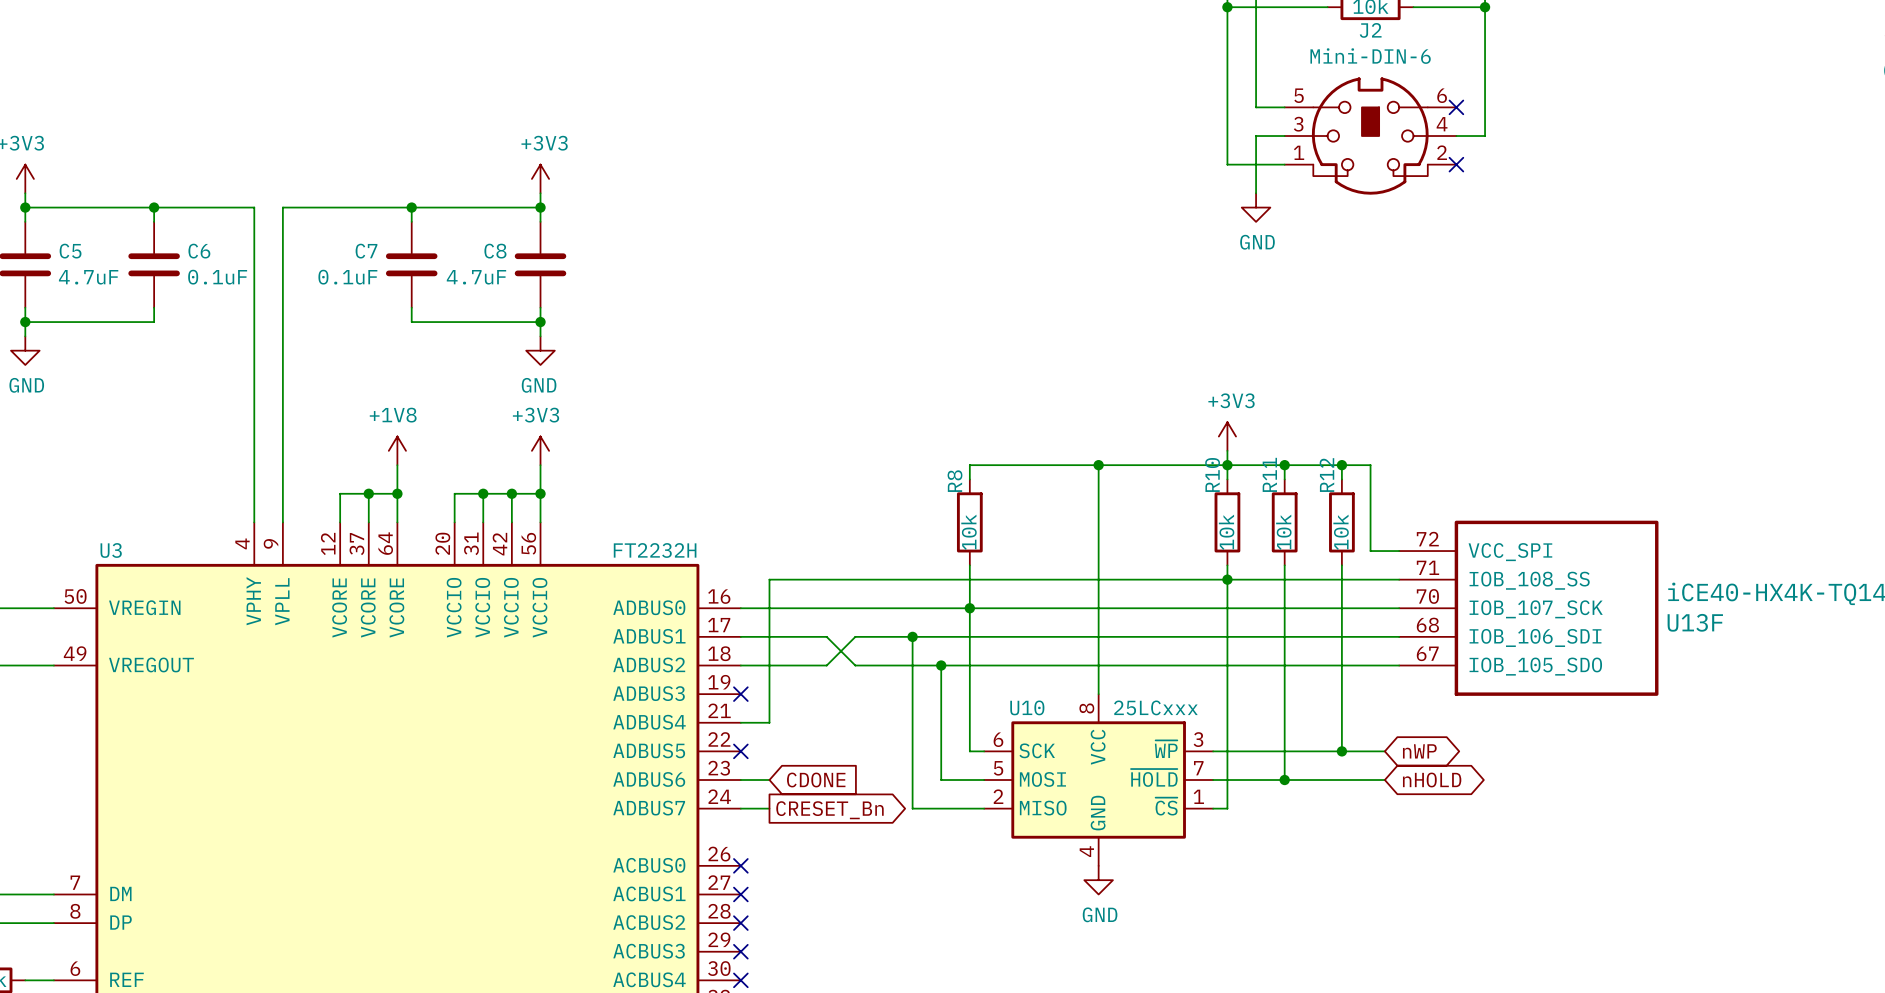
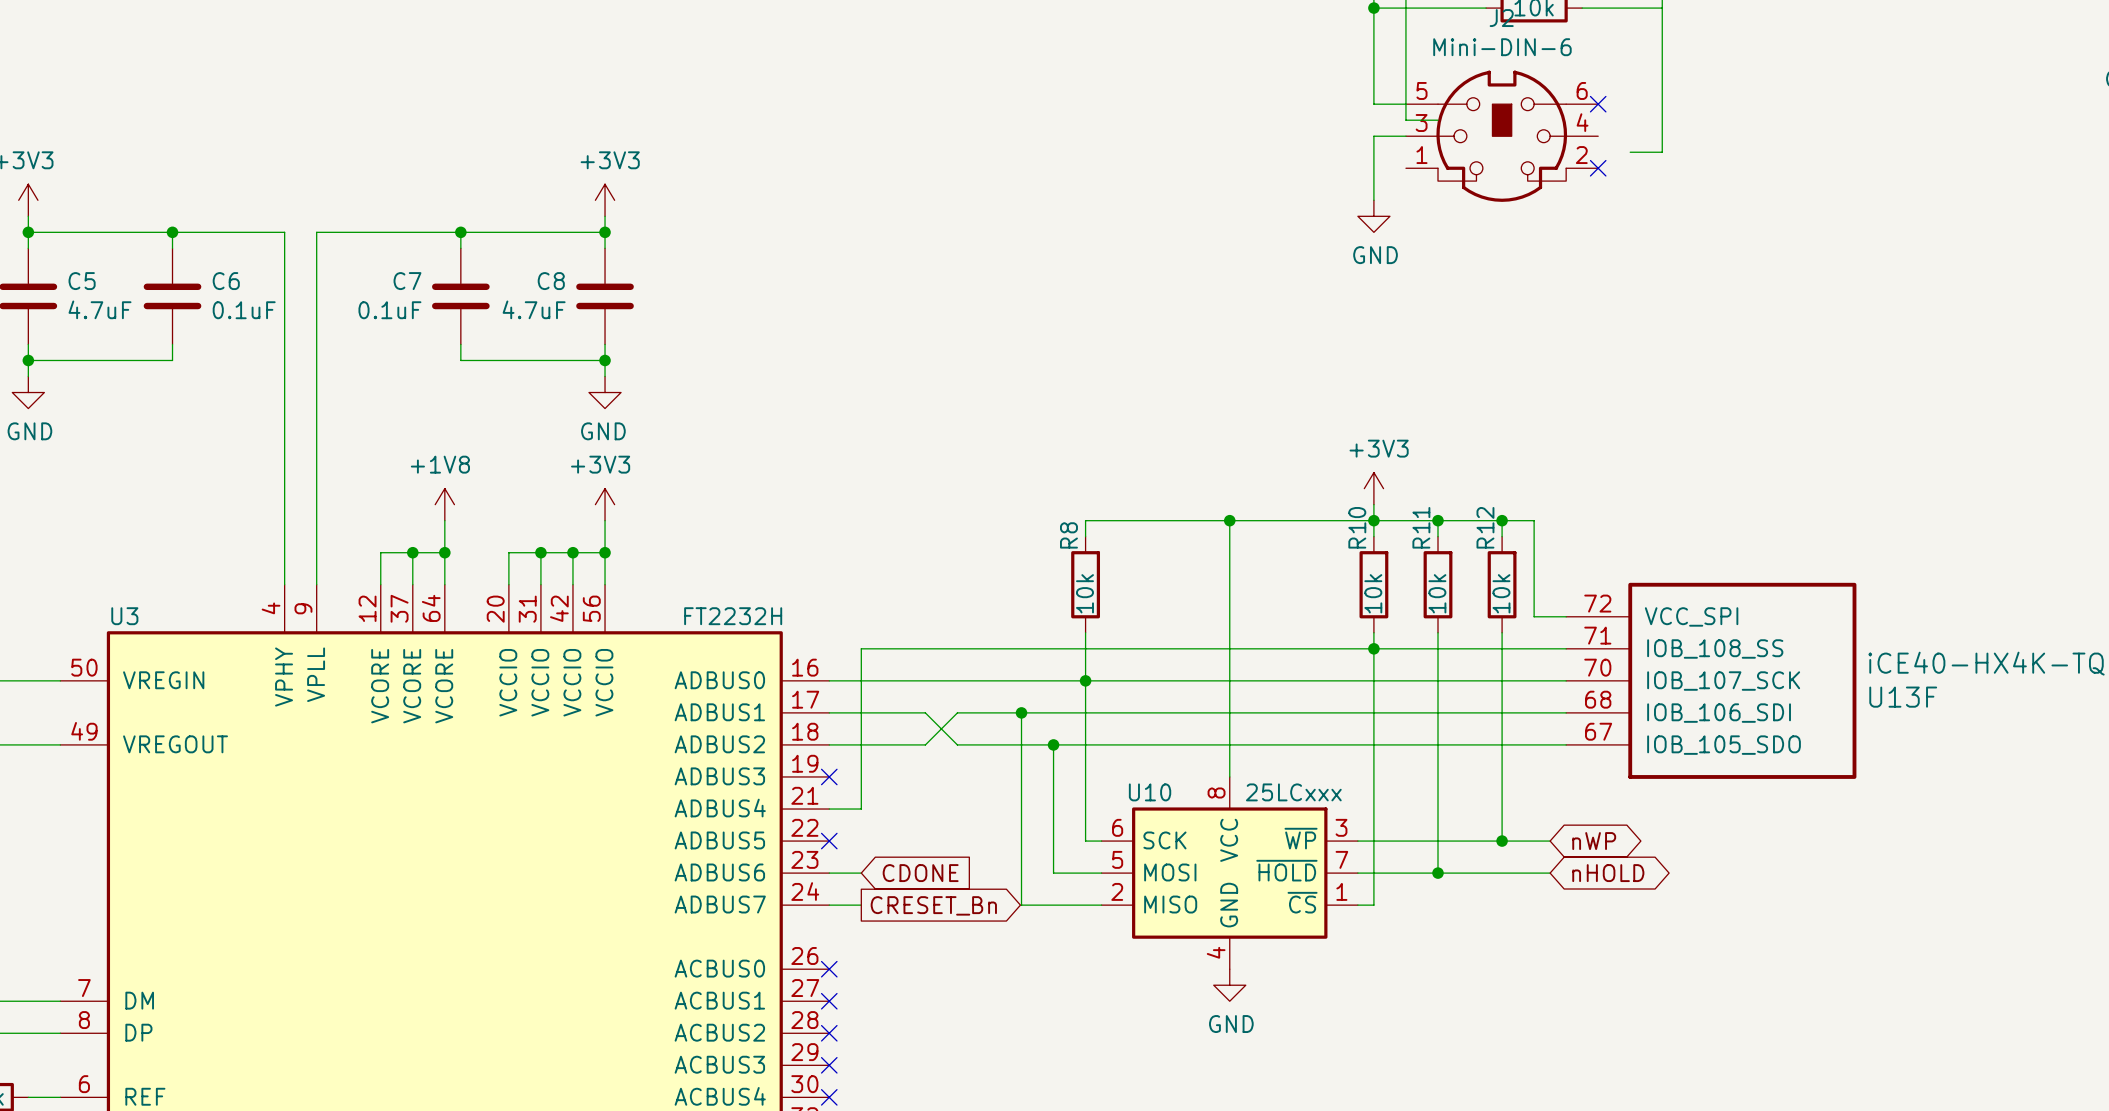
junction: (1485, 7) -> none
wire: (1227, 93) (1227, 121) -> (1373, 104) (1405, 104)
no-connect mark: none -> (1598, 104)
no-connect mark: (1456, 107) -> none
wire: none -> (1373, 136) (1405, 136)
wire: (1284, 136) (1256, 136) (1256, 193) -> none
J2 position: (1370, 136) -> (1502, 136)
no-connect mark: none -> (1598, 168)
wire: (1227, 164) (1284, 164) -> (1373, 184) (1373, 200)
no-connect mark: (1456, 164) -> none
power symbol position: GND (1256, 207) -> GND (1373, 216)

